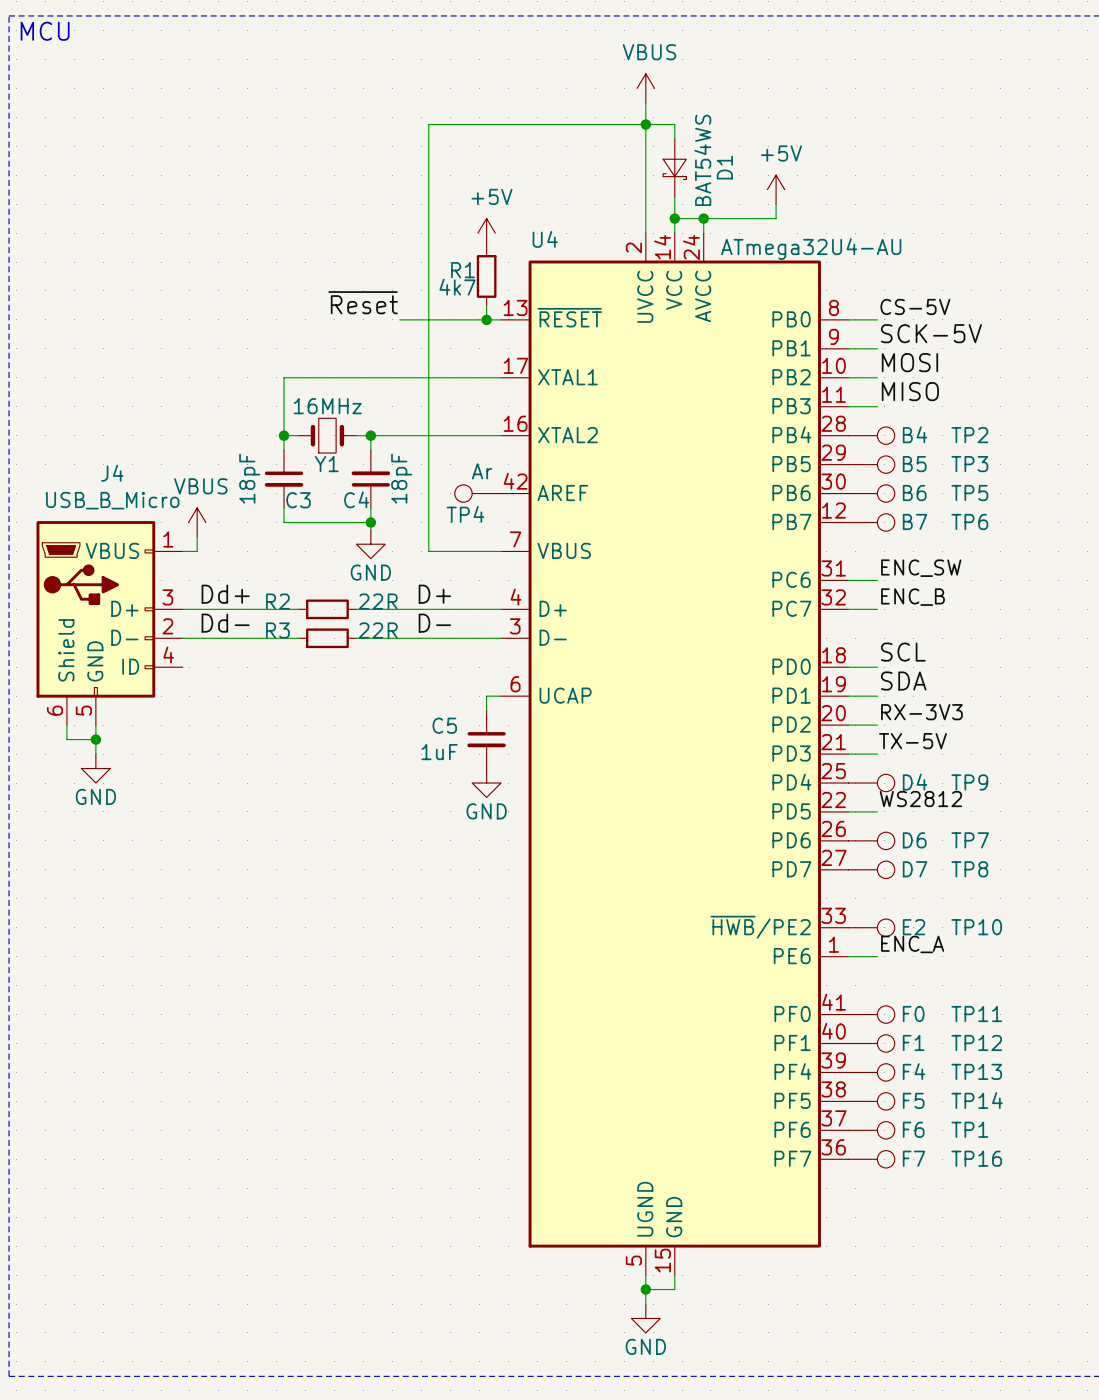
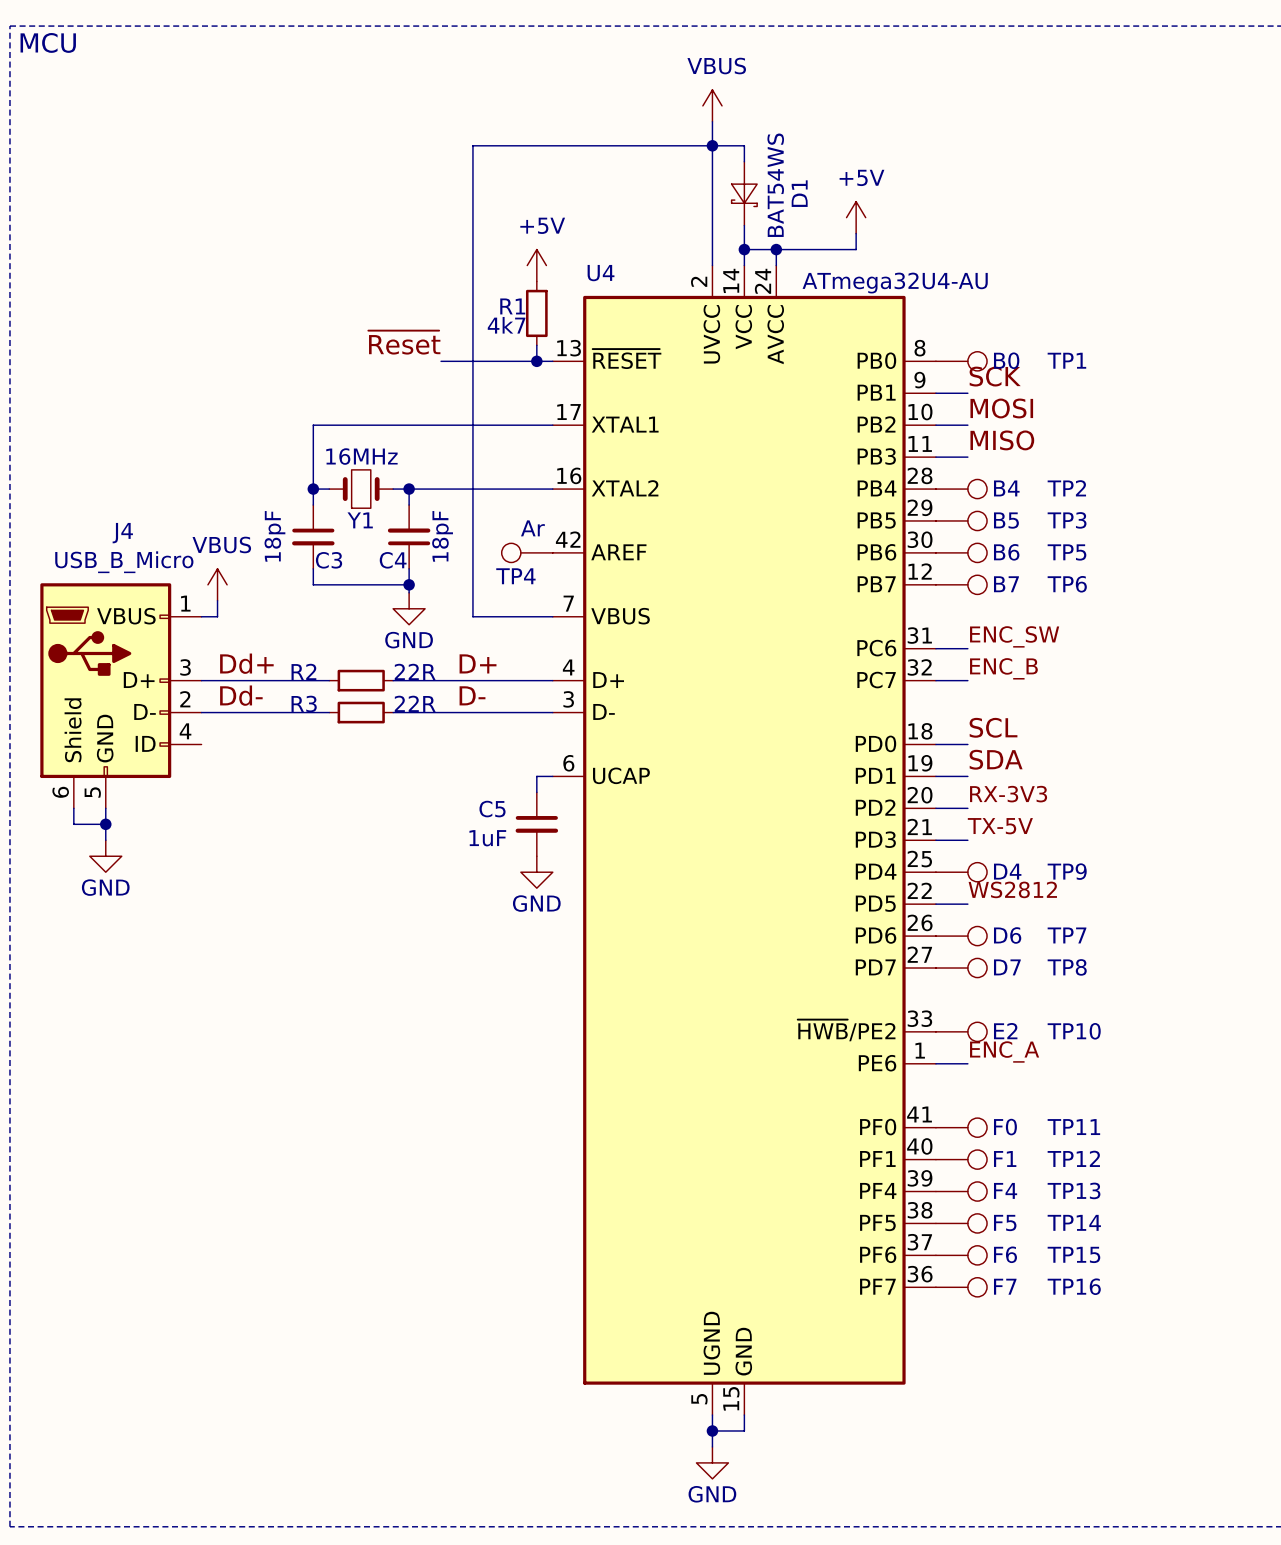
label: CS-5V (915, 306) -> none
TP1: none -> B0 (961, 361)
label: SCK-5V (931, 333) -> SCK (995, 376)
TP1 name: TP1 (969, 1129) -> TP15 (1073, 1254)

